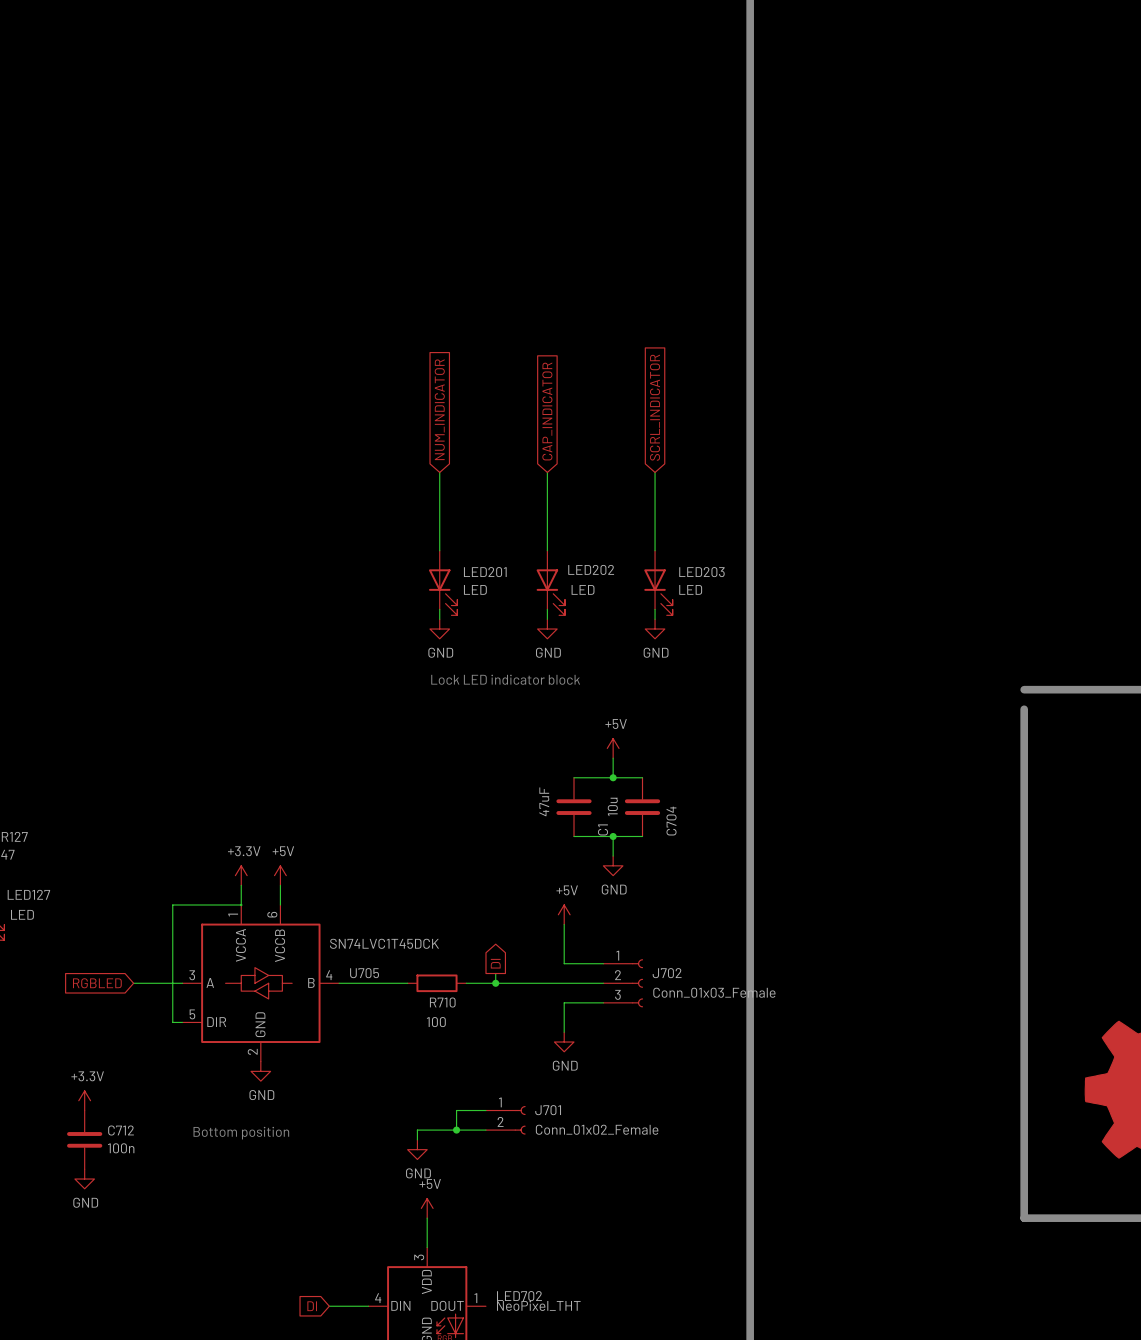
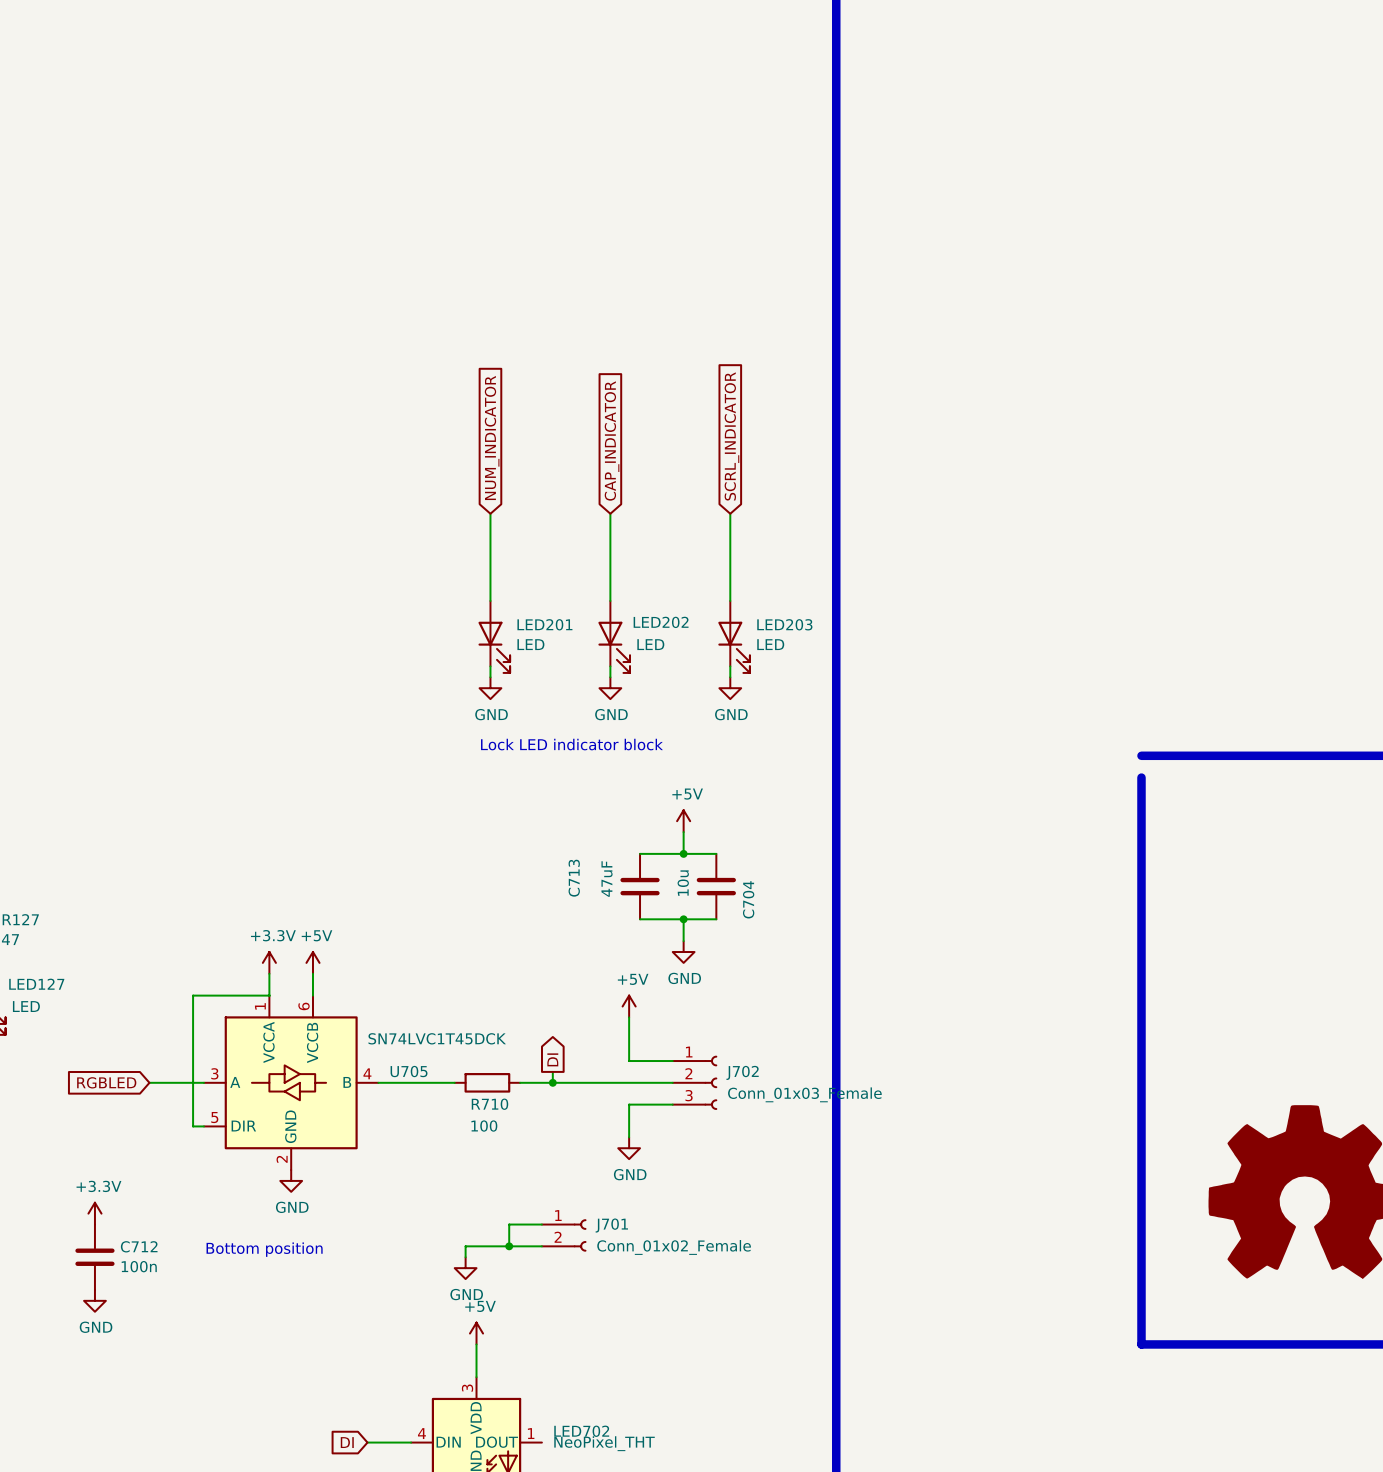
C1 name: C1 (603, 829) -> C713 (574, 878)

